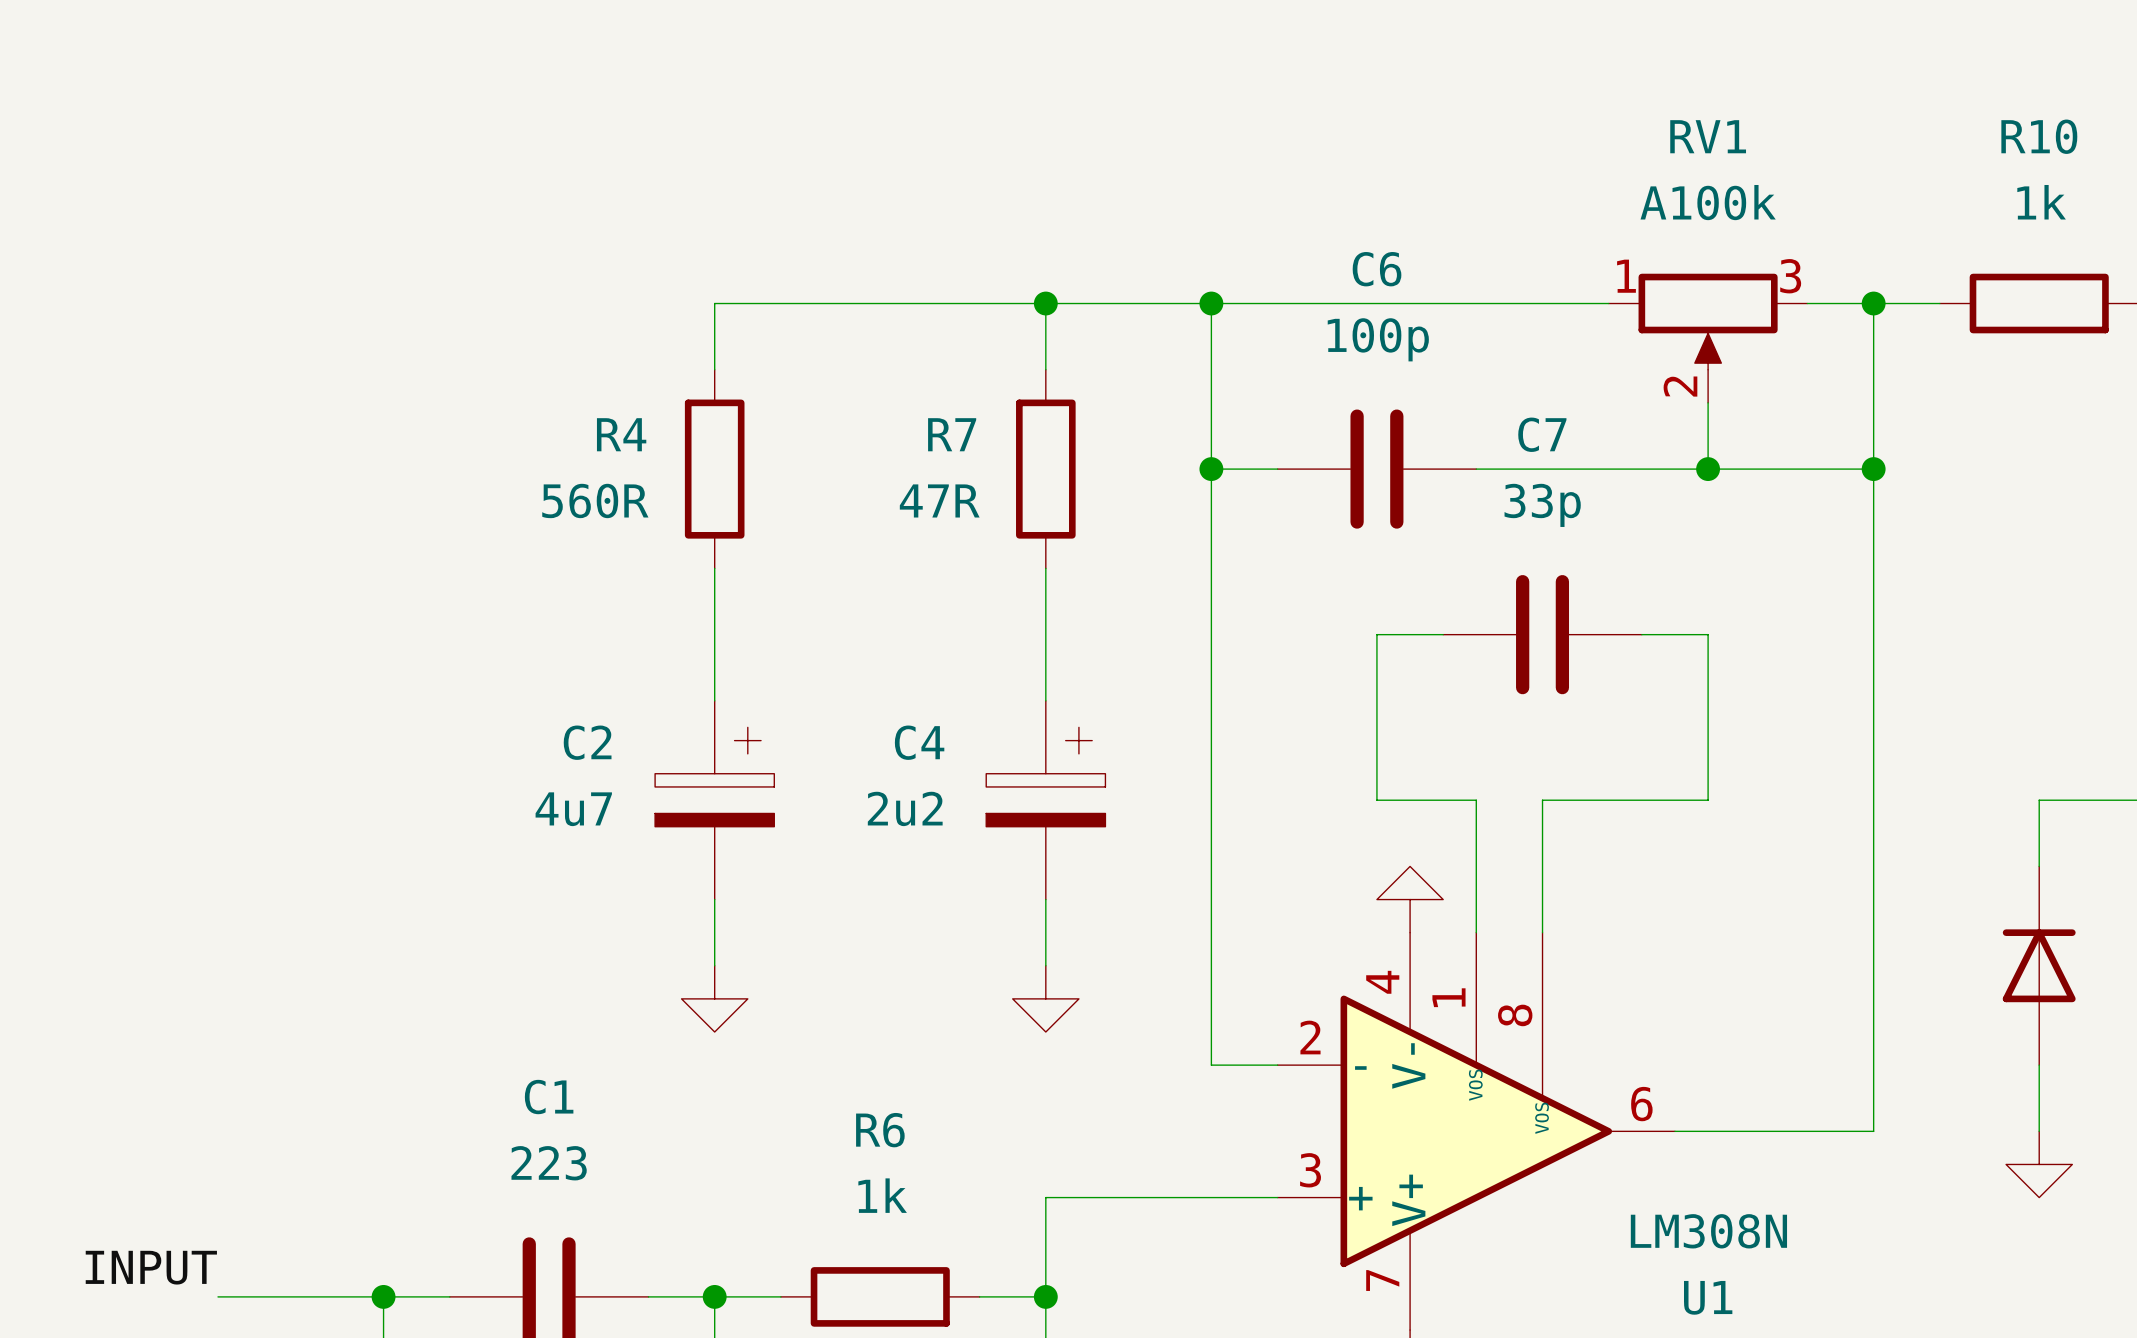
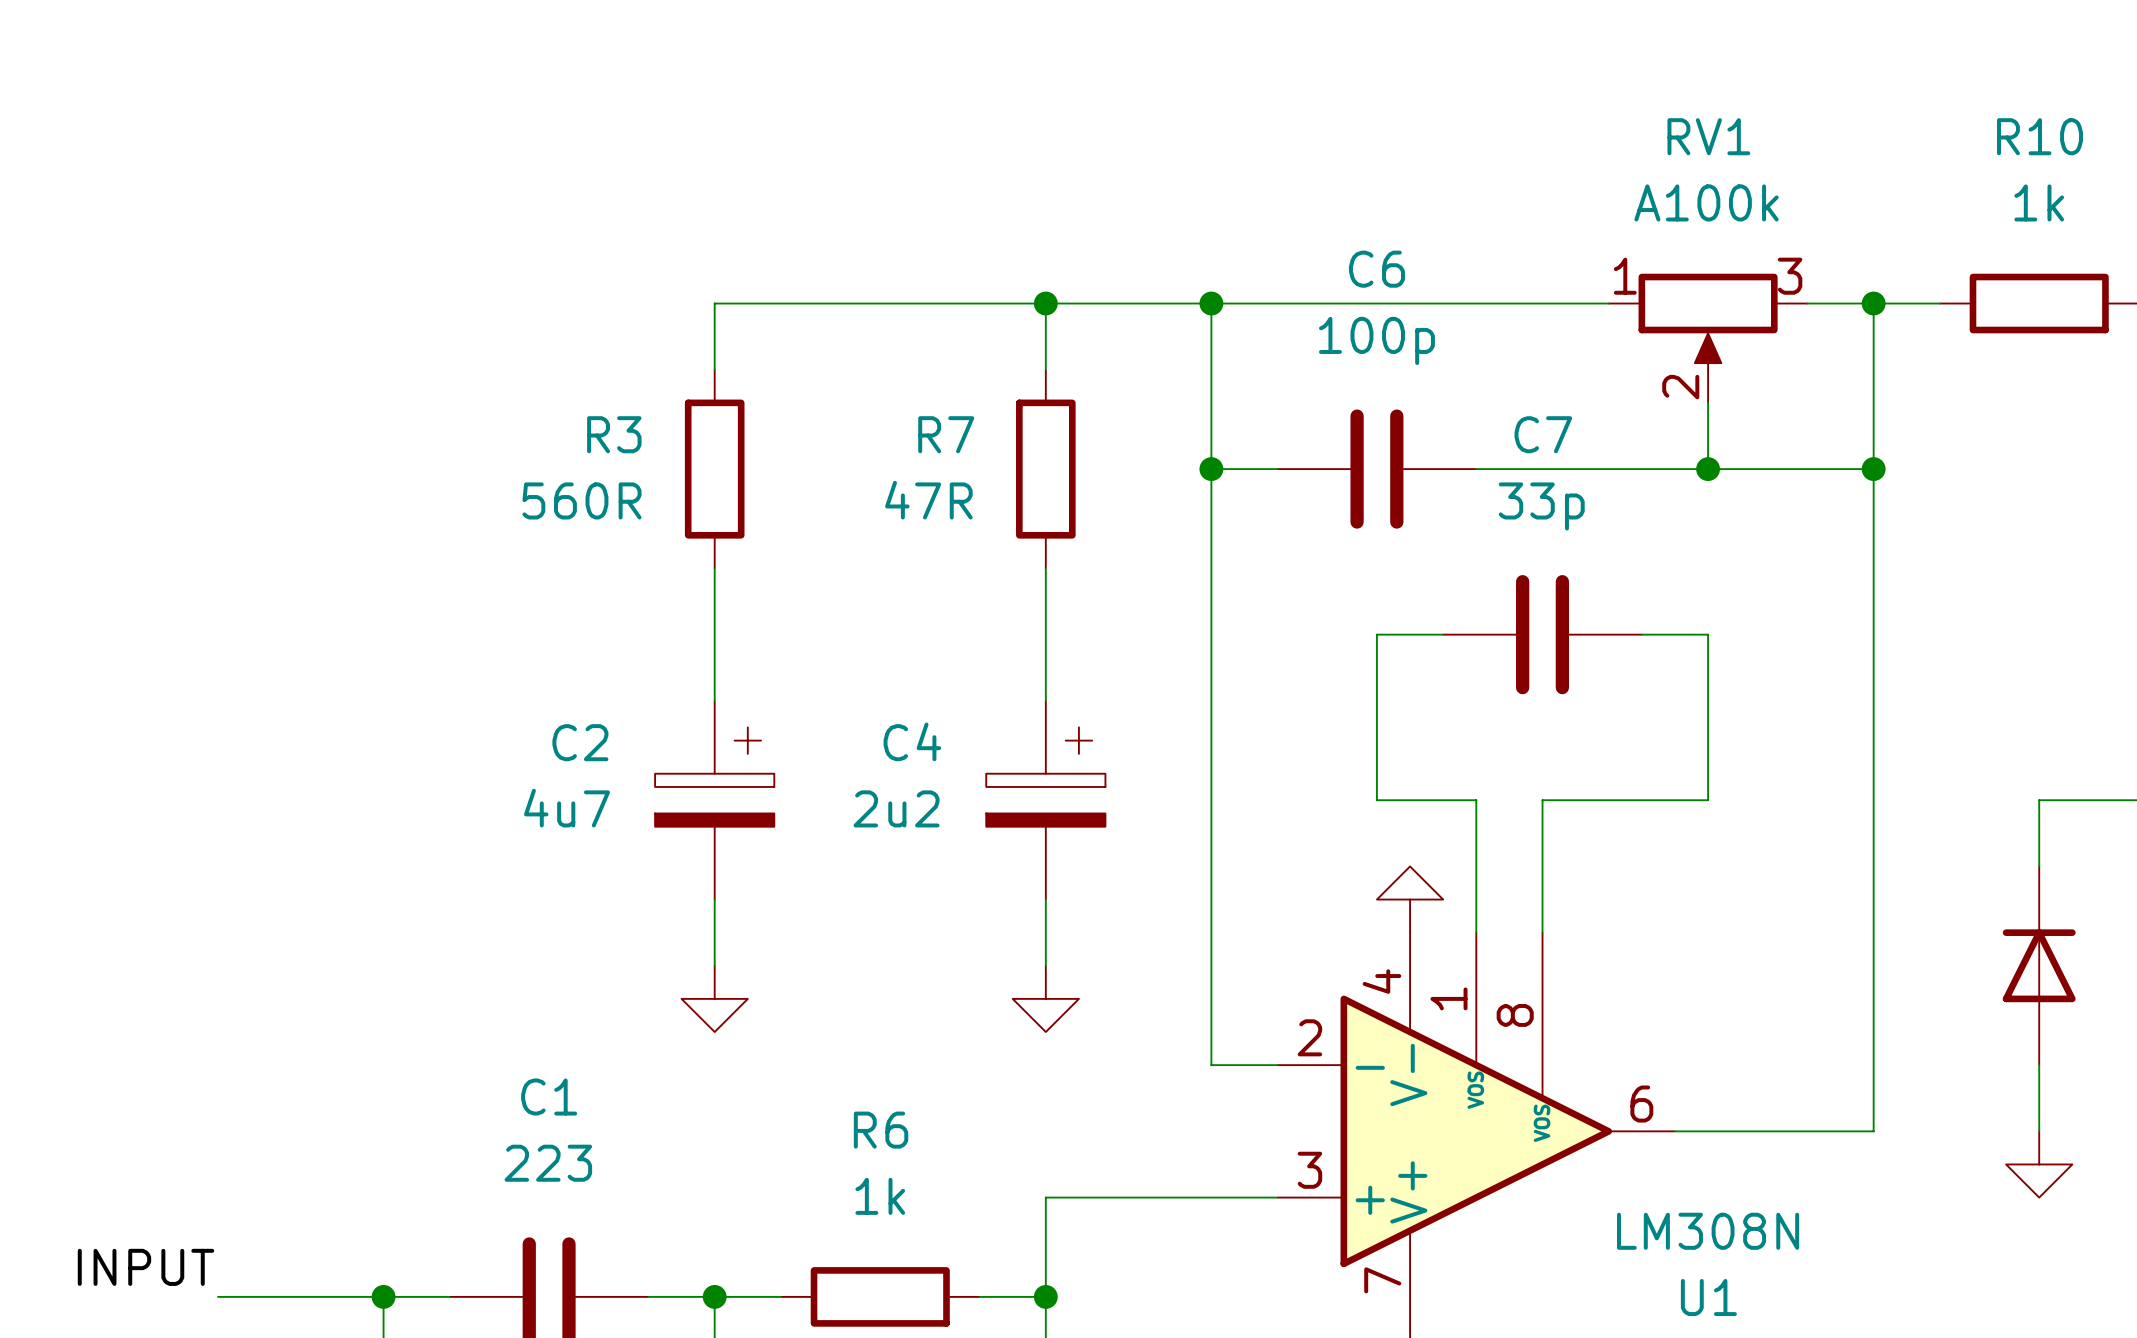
R4 name: R4 (621, 434) -> R3 (614, 434)

